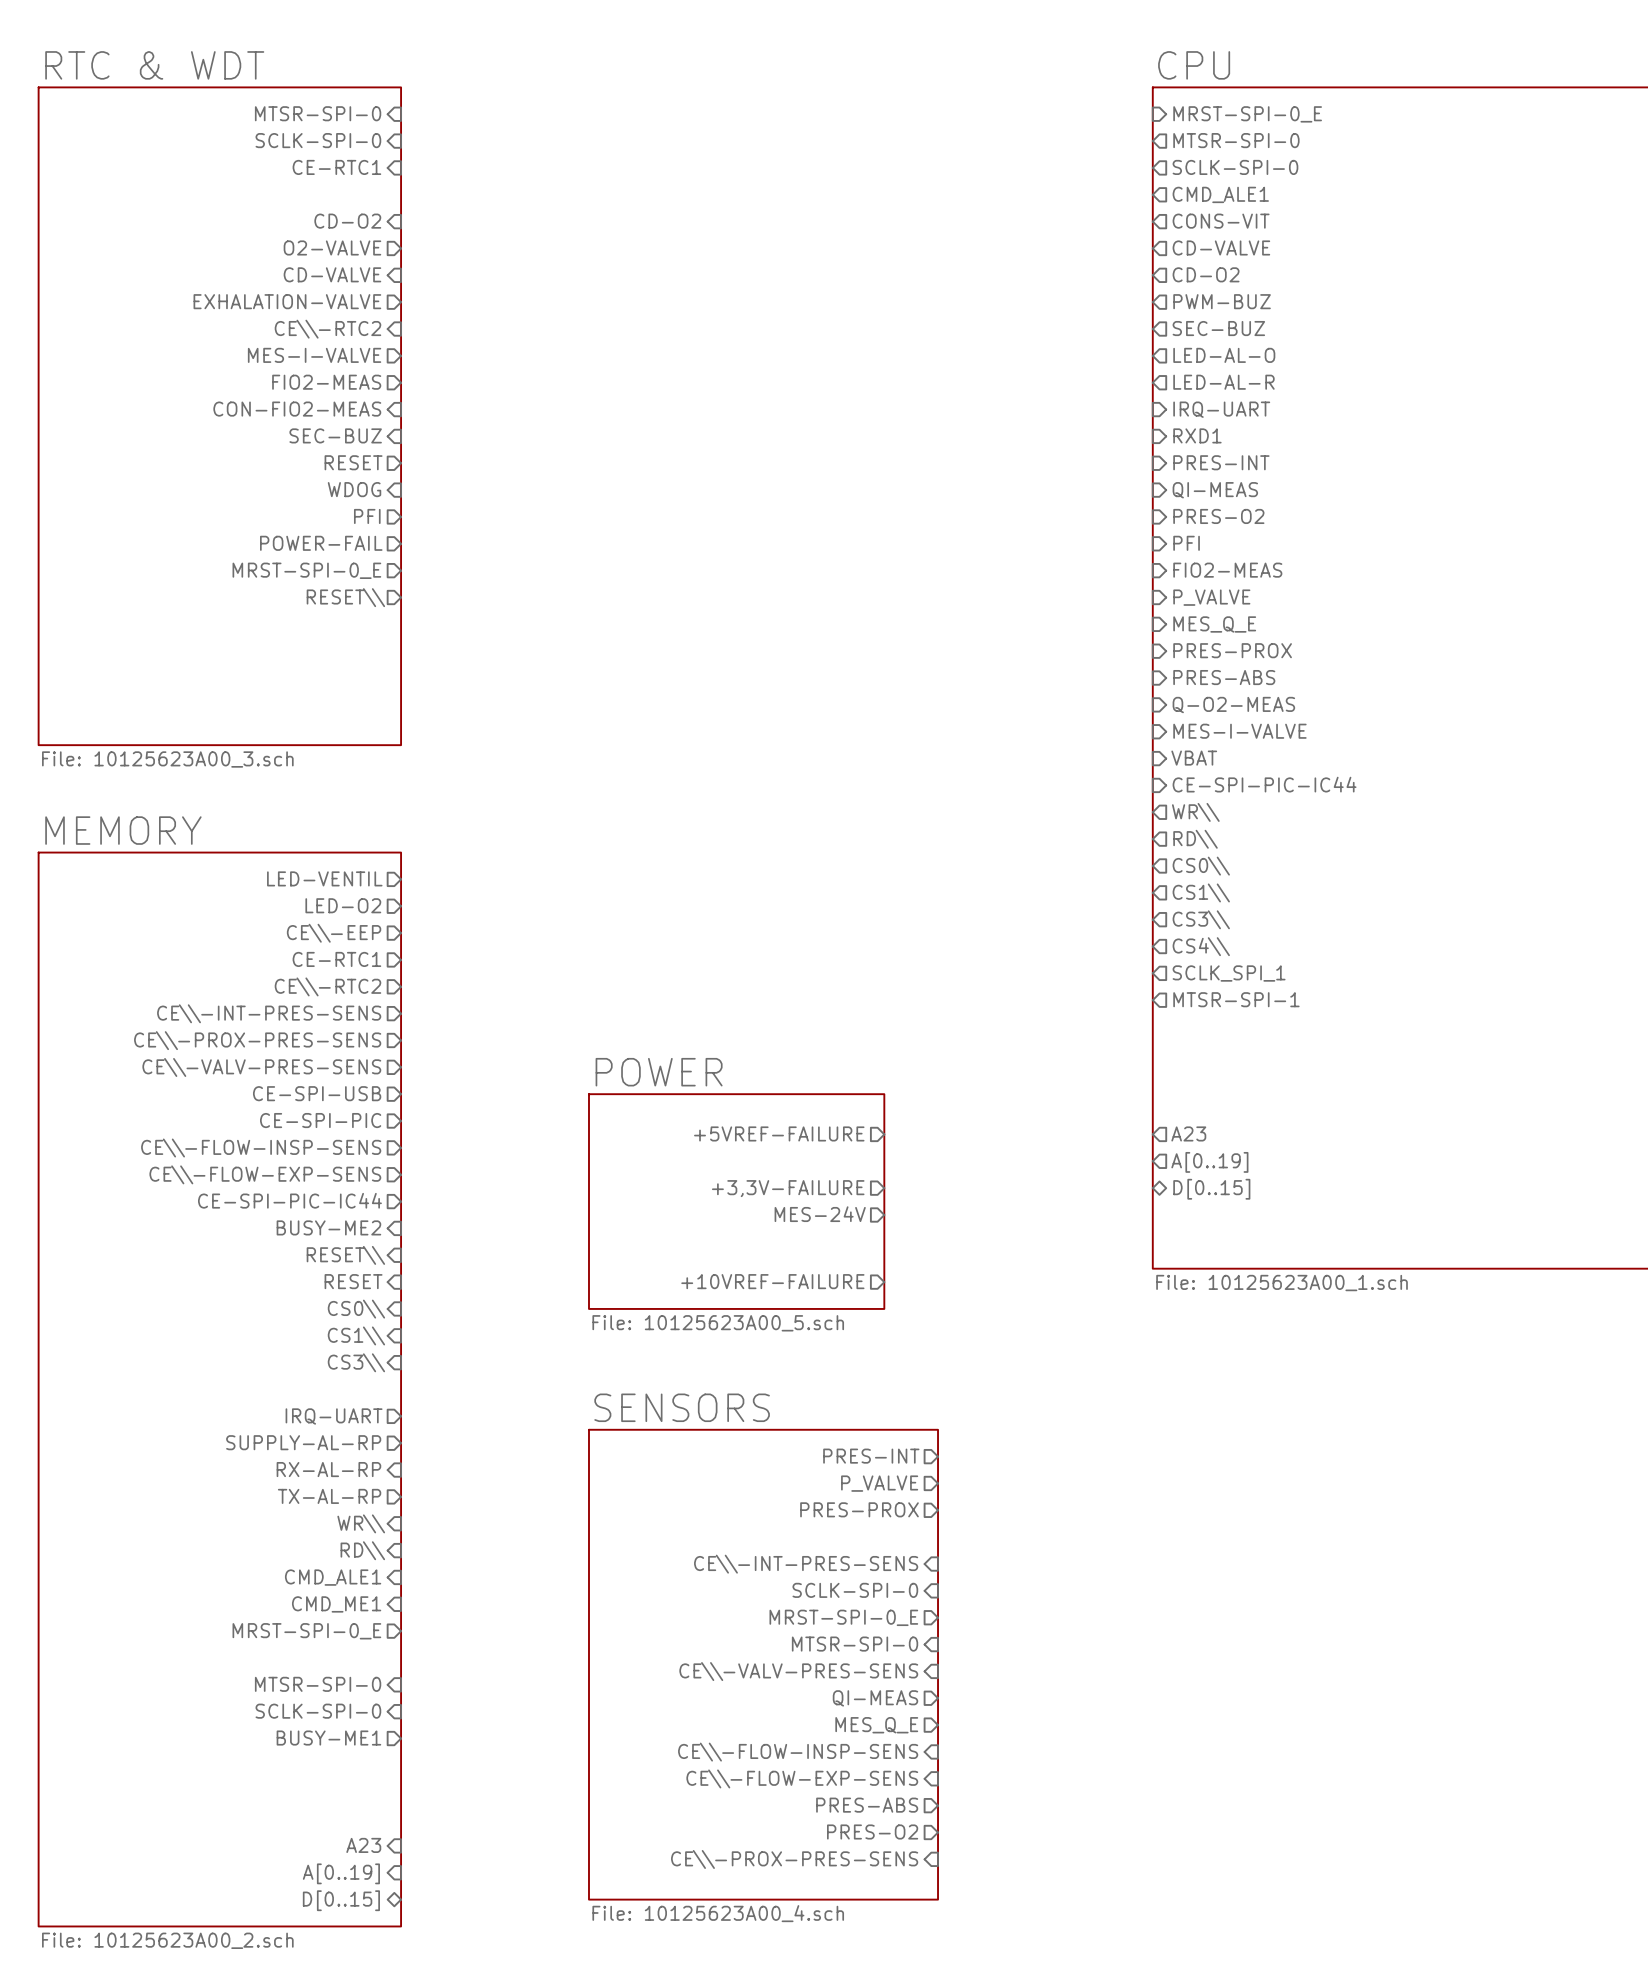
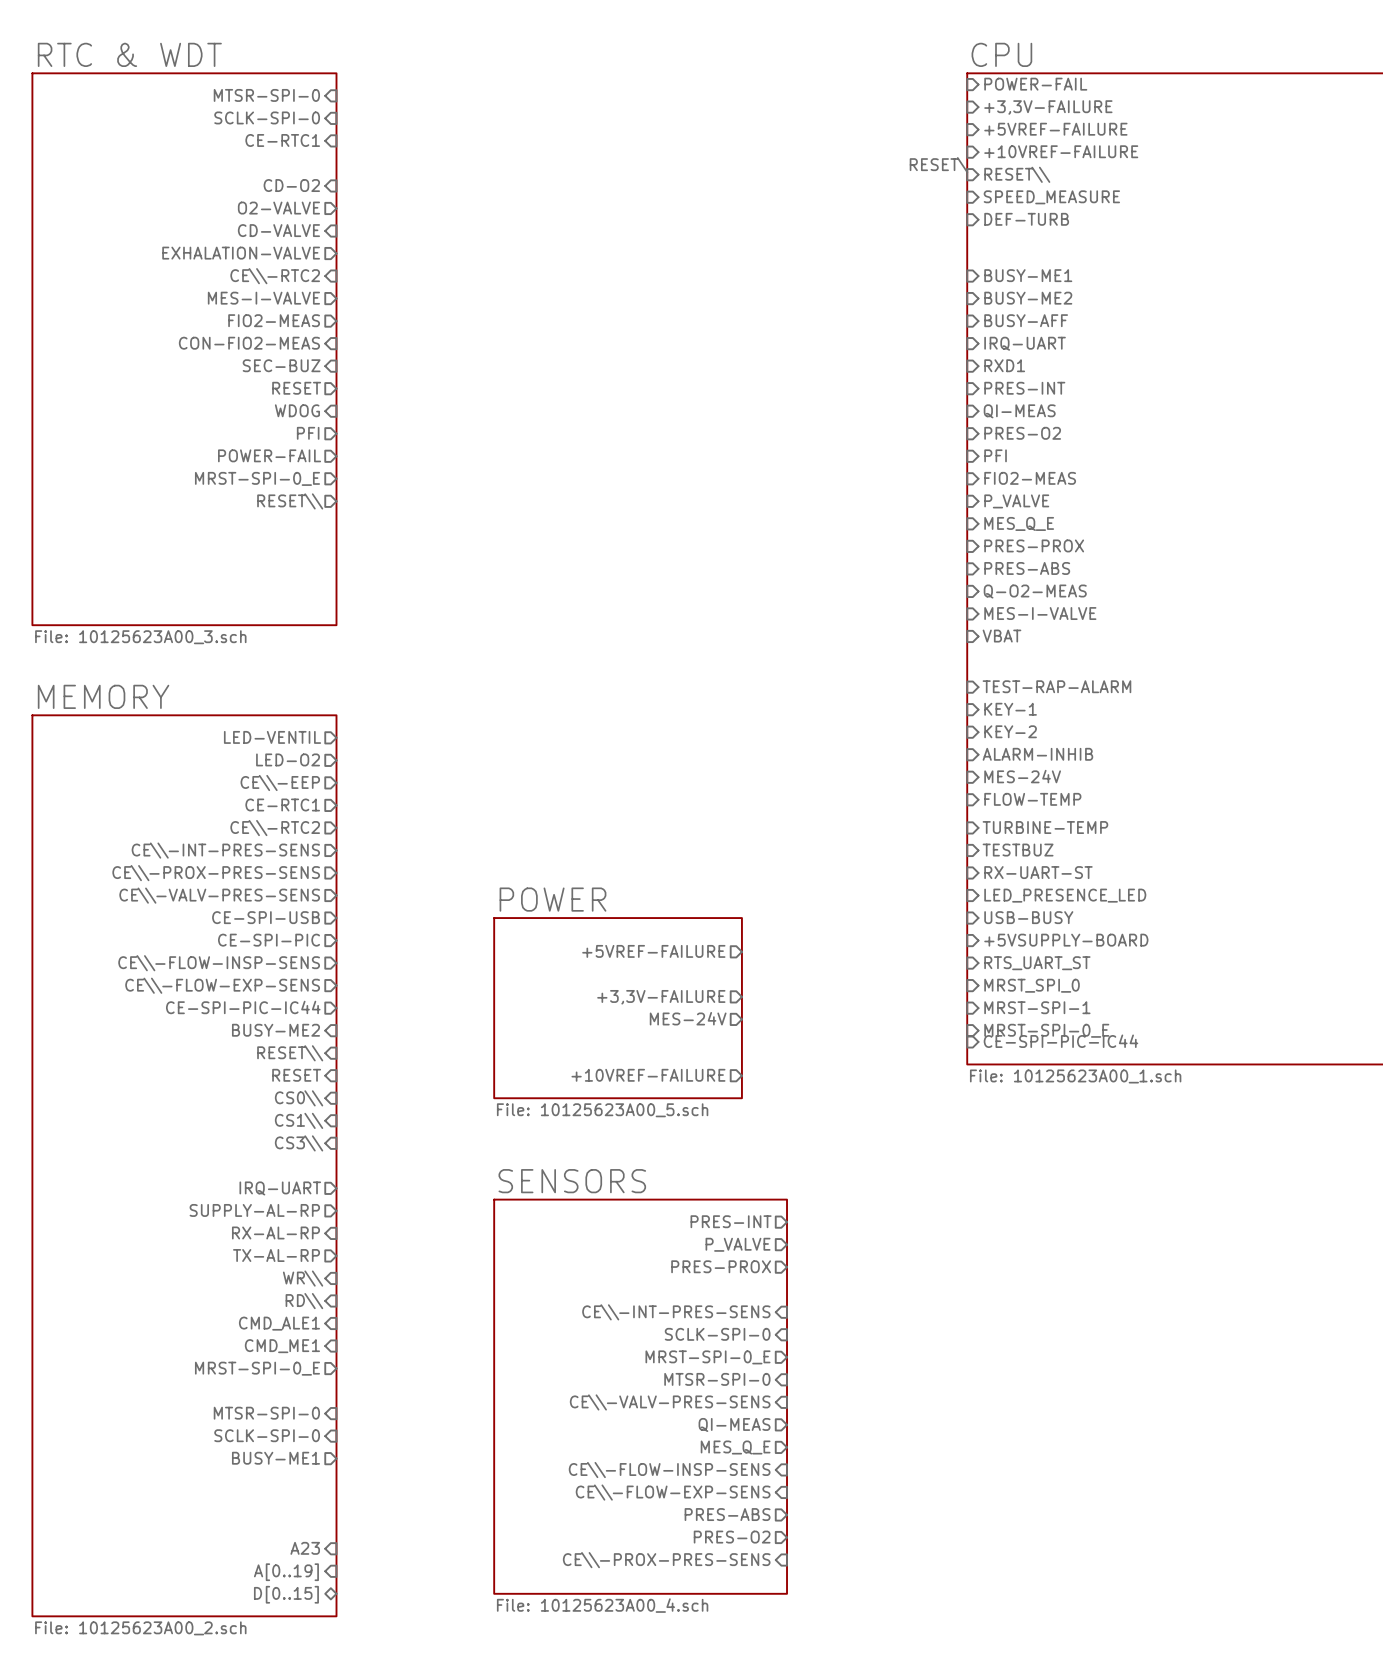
sheet pin: none -> POWER-FAIL (1035, 84)
sheet pin: MRST-SPI-0_E (1247, 114) -> none
sheet pin: none -> +3,3V-FAILURE (1048, 107)
sheet pin: MTSR-SPI-0 (1236, 140) -> none
sheet pin: none -> +5VREF-FAILURE (1055, 129)
sheet pin: SCLK-SPI-0 (1235, 167) -> none
sheet pin: none -> +10VREF-FAILURE (1061, 151)
sheet pin: CMD_ALE1 (1220, 194) -> none
label: none -> RESET\ (938, 165)
sheet pin: none -> RESET\\ (1017, 174)
sheet pin: CONS-VIT (1221, 221) -> none
sheet pin: none -> SPEED_MEASURE (1051, 197)
sheet pin: CD-VALVE (1221, 247) -> none
sheet pin: none -> DEF-TURB (1026, 219)
sheet pin: CD-O2 (1206, 274) -> none
sheet pin: PWM-BUZ (1222, 301) -> none
sheet pin shape: output (1218, 328) -> input (1028, 275)
sheet pin: SEC-BUZ (1218, 328) -> BUSY-ME1 (1028, 275)
sheet pin shape: output (1224, 355) -> input (1028, 298)
sheet pin: LED-AL-O (1224, 355) -> BUSY-ME2 (1028, 298)
sheet pin shape: output (1223, 382) -> input (1026, 320)
sheet pin: LED-AL-R (1223, 382) -> BUSY-AFF (1026, 320)
sheet pin: CE-SPI-PIC-IC44 (1264, 784) -> none
sheet pin shape: output (1195, 812) -> input (1056, 686)
sheet pin: WR\\ (1195, 812) -> TEST-RAP-ALARM (1056, 686)
sheet pin shape: output (1195, 839) -> input (1010, 709)
sheet pin: RD\\ (1195, 839) -> KEY-1 (1010, 709)
sheet pin shape: output (1201, 866) -> input (1010, 731)
sheet pin: CS0\\ (1201, 866) -> KEY-2 (1010, 731)
sheet pin shape: output (1201, 892) -> input (1037, 754)
sheet pin: CS1\\ (1201, 892) -> ALARM-INHIB (1037, 754)
sheet pin shape: output (1201, 919) -> input (1022, 776)
sheet pin: CS3\\ (1201, 919) -> MES-24V (1022, 776)
sheet pin shape: output (1201, 946) -> input (1032, 799)
sheet pin: CS4\\ (1201, 946) -> FLOW-TEMP (1032, 799)
sheet pin: SCLK_SPI_1 (1229, 973) -> none
sheet pin: none -> TURBINE-TEMP (1045, 827)
sheet pin: MTSR-SPI-1 (1236, 999) -> none
sheet pin: none -> TESTBUZ (1018, 850)
sheet pin: none -> RX-UART-ST (1038, 872)
sheet pin: none -> LED_PRESENCE_LED (1065, 895)
sheet pin: none -> USB-BUSY (1028, 917)
sheet pin: none -> +5VSUPPLY-BOARD (1066, 940)
sheet pin: A23 (1188, 1133) -> none
sheet pin: none -> RTS_UART_ST (1037, 963)
sheet pin: A[0..19] (1209, 1162) -> none
sheet pin: none -> MRST_SPI_0 (1032, 985)
sheet pin: D[0..15] (1211, 1189) -> none
sheet pin: none -> MRST-SPI-1 (1037, 1007)
sheet pin: none -> MRST-SPI-0_E (1046, 1030)
sheet pin: none -> CE-SPI-PIC-IC44 (1060, 1041)

